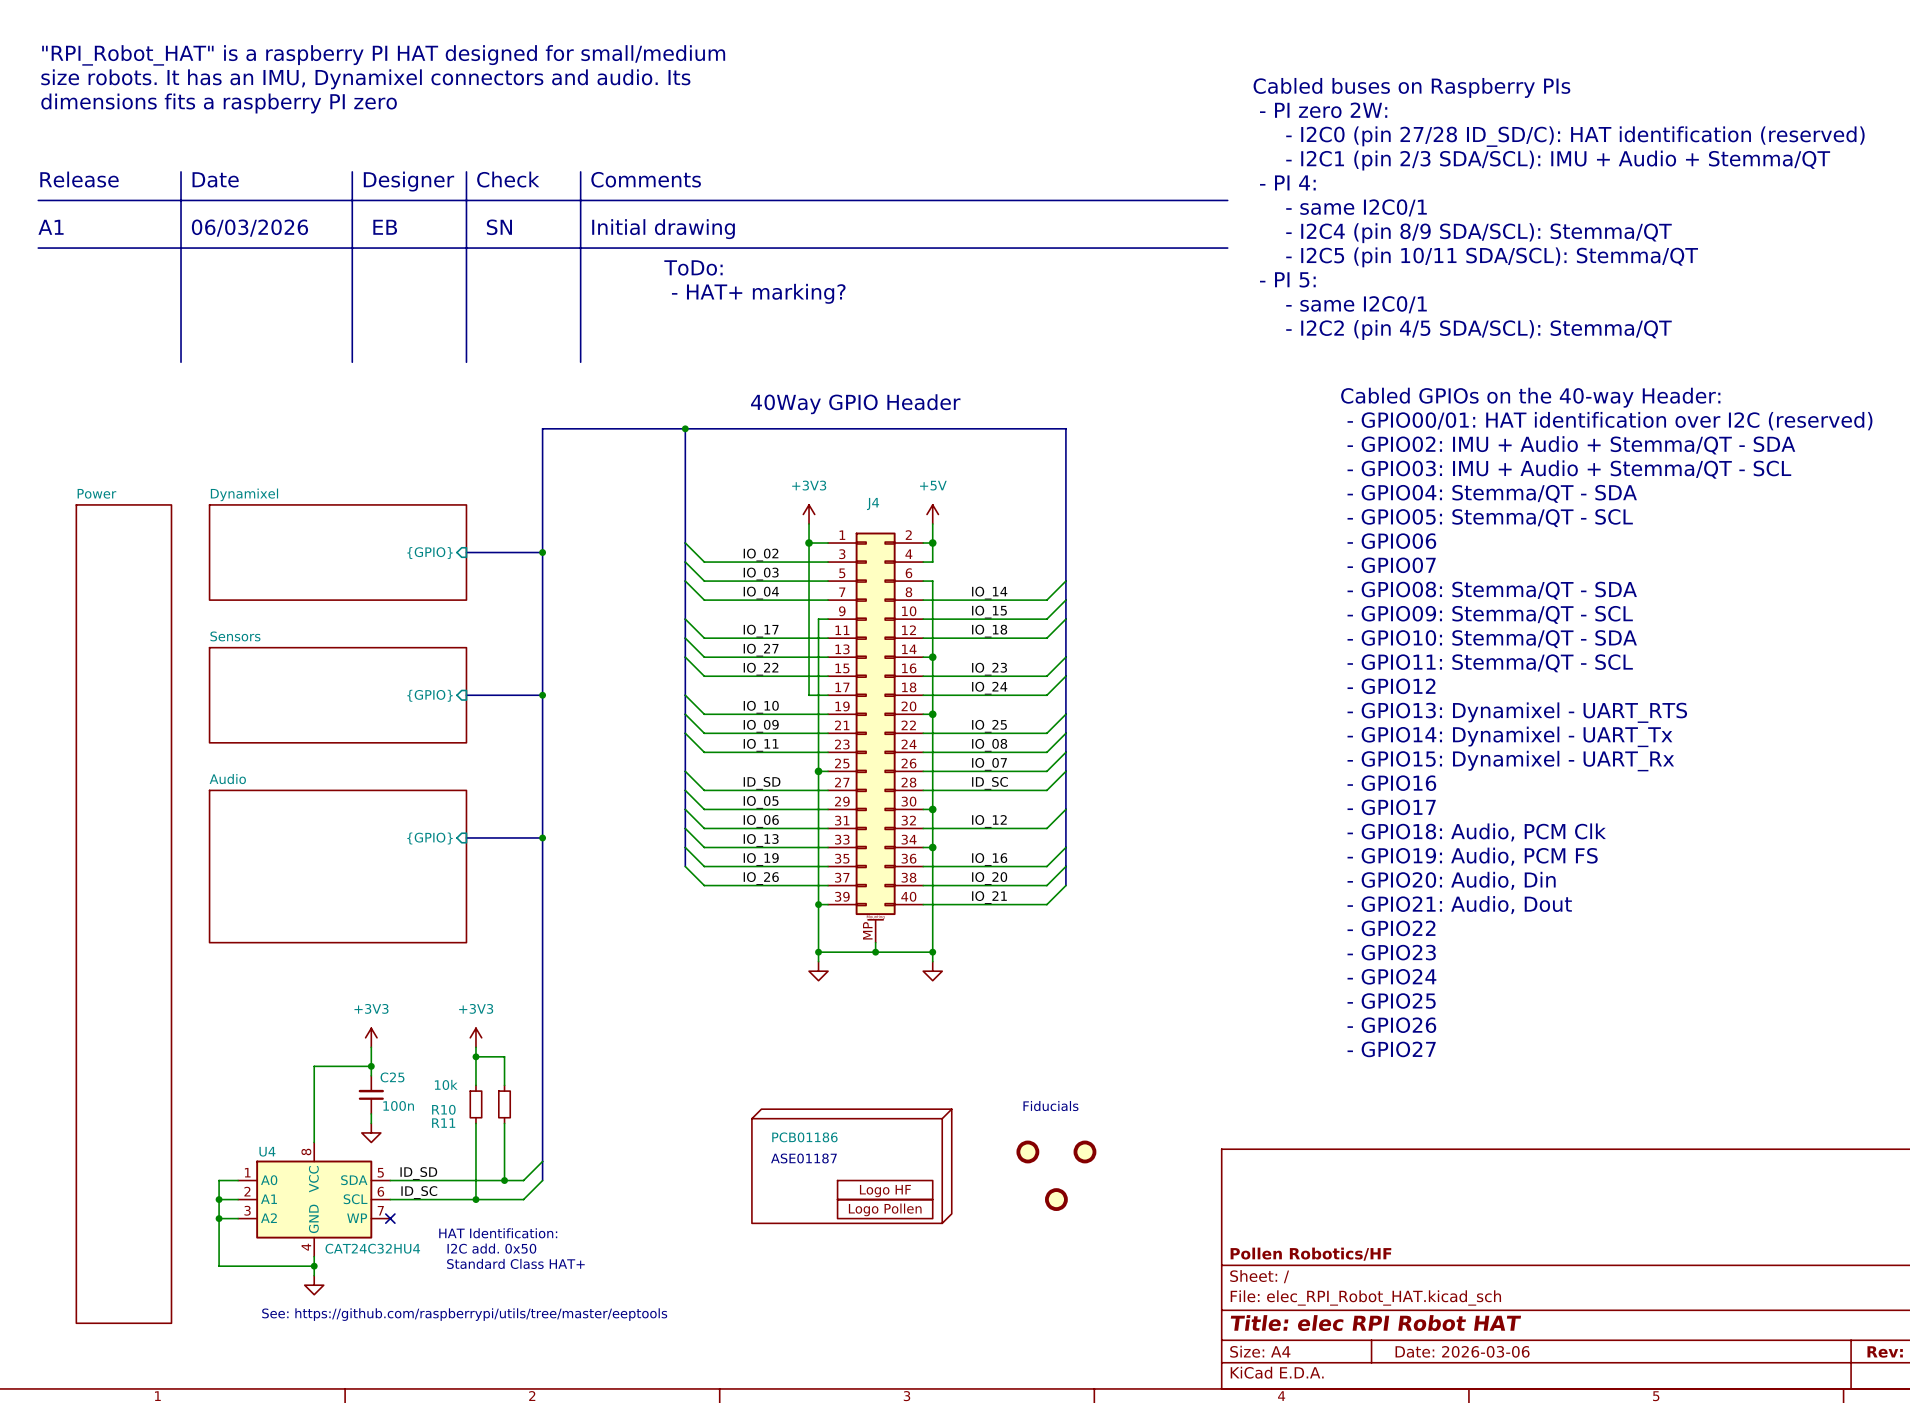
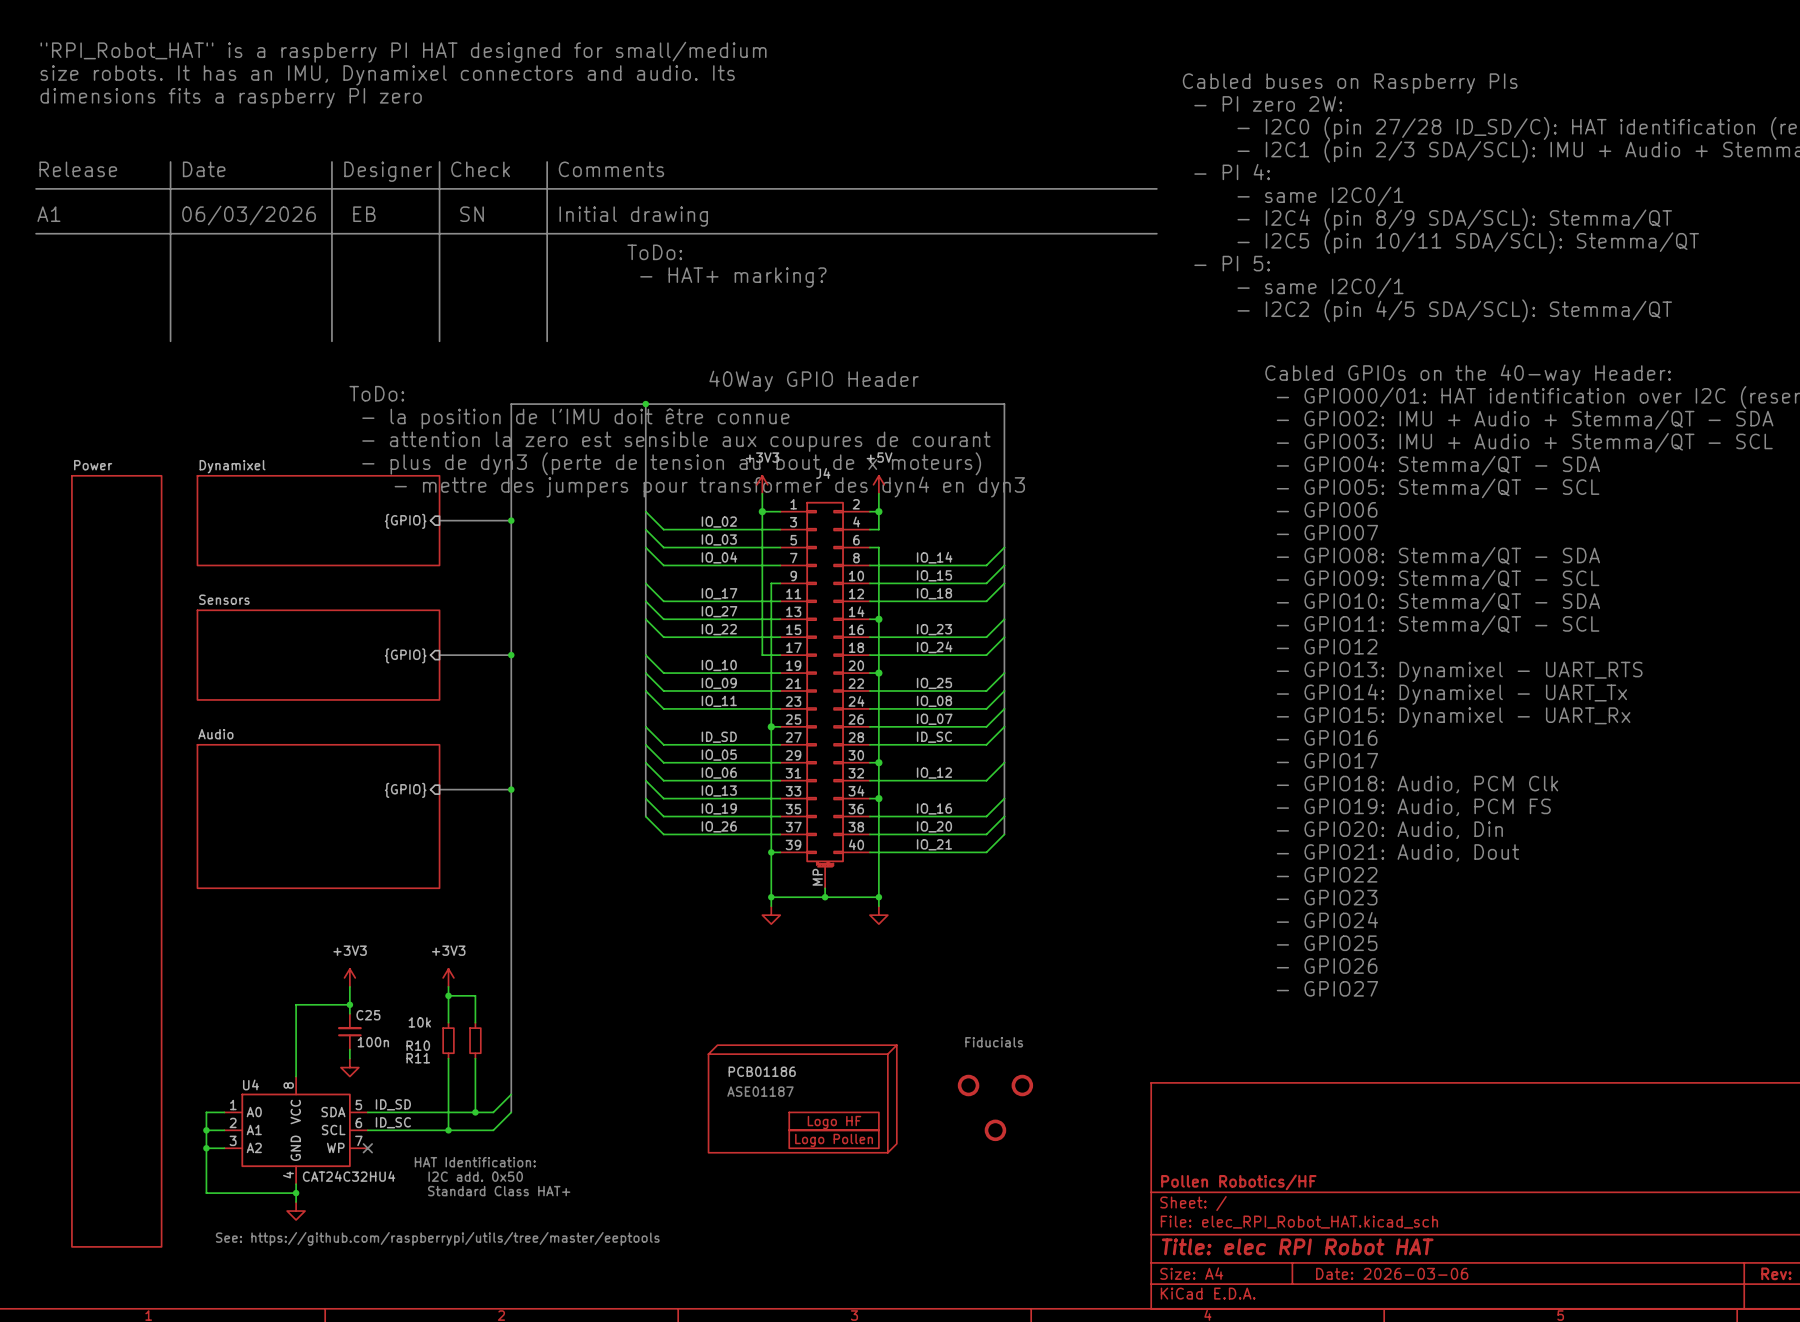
text: none -> ToDo: (376, 393)
text: none -> - la position de l'IMU doit être connue (575, 418)
text: none -> - attention la zero est sensible aux coupures de courant (676, 441)
text: none -> - plus de dyn3 (perte de tension au bout de x moteurs) (671, 463)
text: none -> - mettre des jumpers pour transformer des dyn4 en dyn3 (709, 486)

